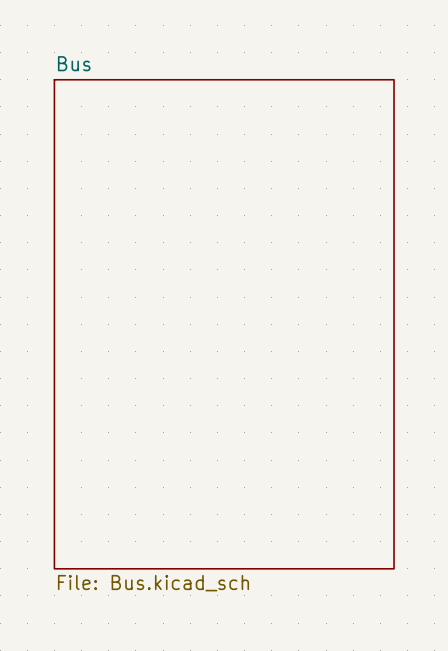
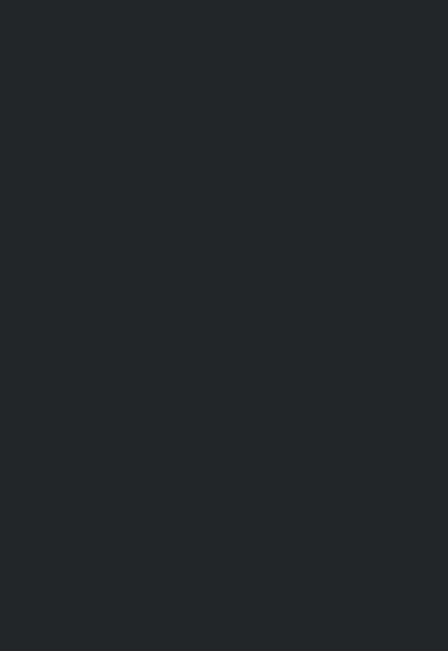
sheet Bus: File: Bus.kicad_sch (224, 324) -> none

